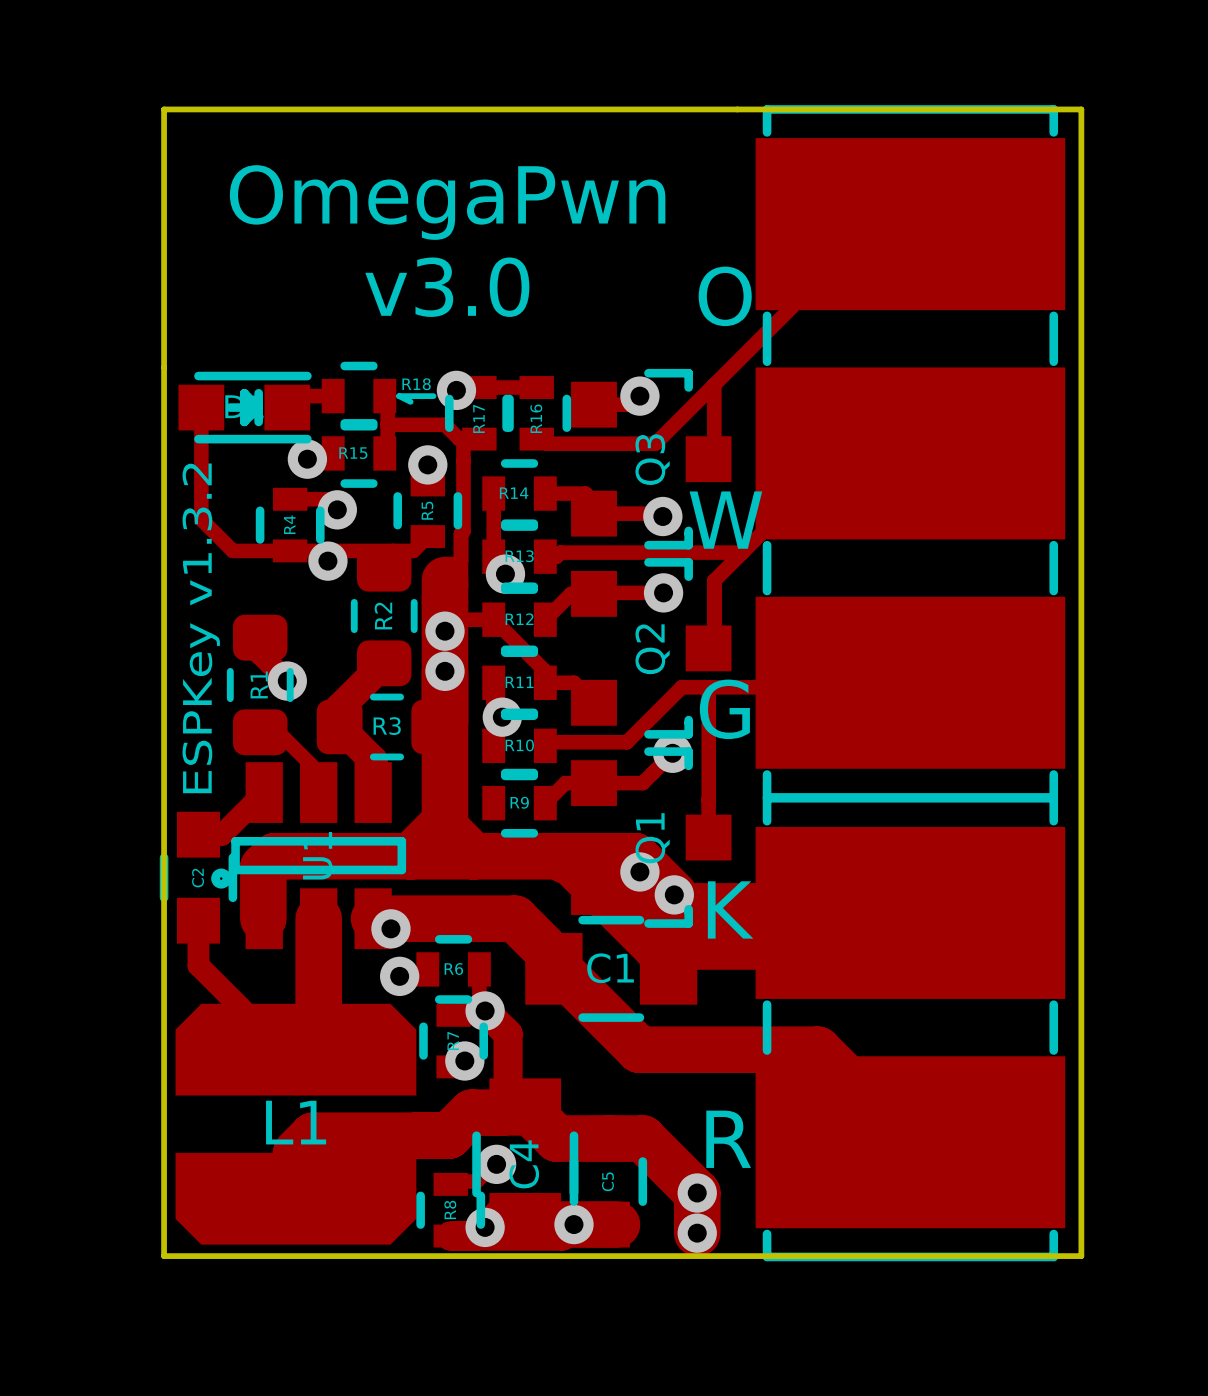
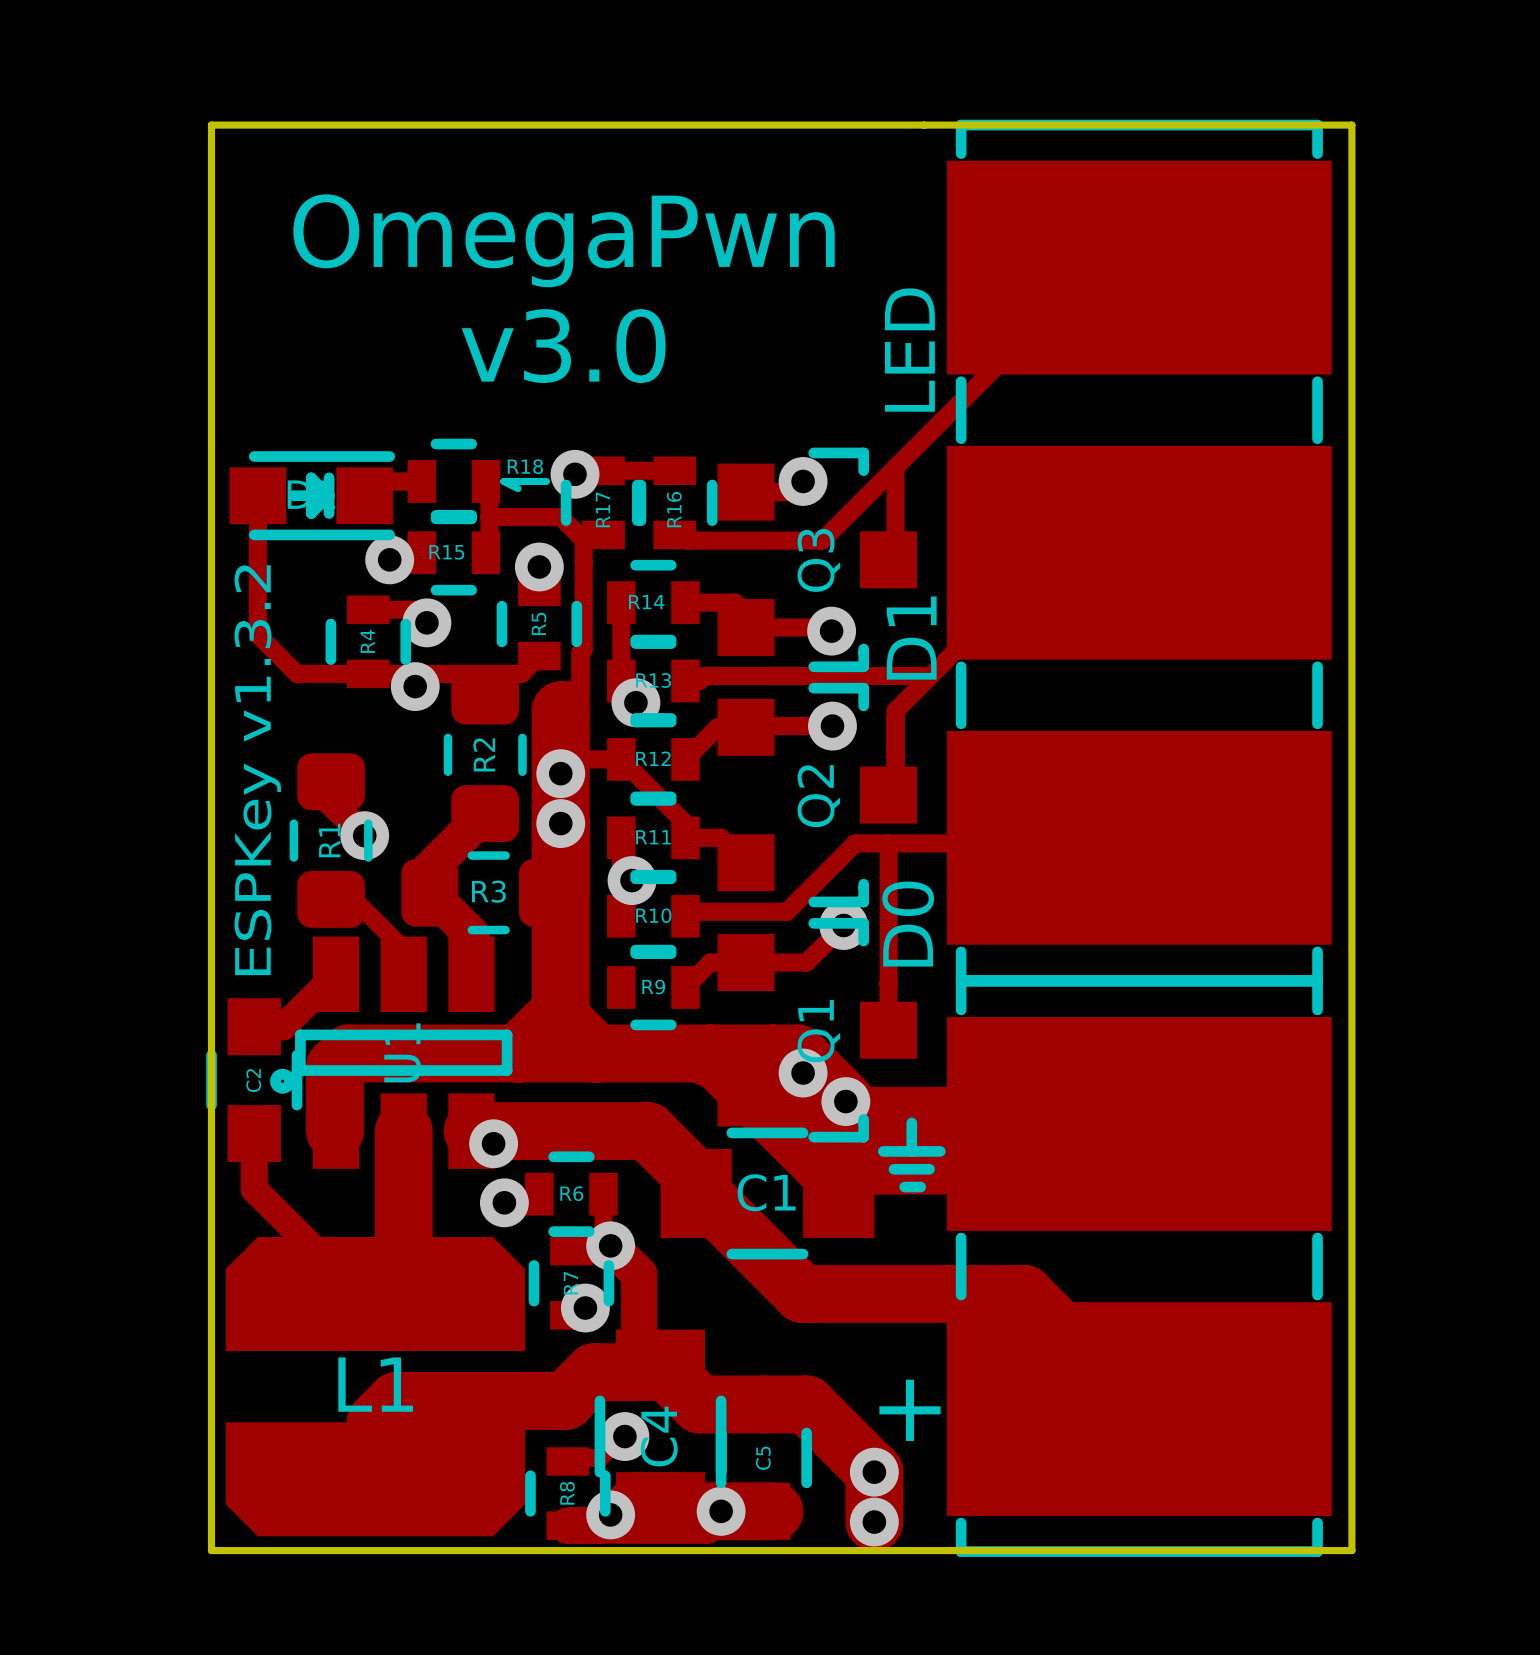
text: O (725, 296) -> LED (909, 350)
text: W (725, 520) -> D1 (911, 638)
text: G (724, 709) -> D0 (908, 924)
text: K (730, 909) -> none
line: none -> (911, 1122) (911, 1151)
line: none -> (883, 1151) (940, 1151)
line: none -> (893, 1169) (929, 1169)
line: none -> (904, 1187) (920, 1187)
text: R (728, 1139) -> + (910, 1410)

